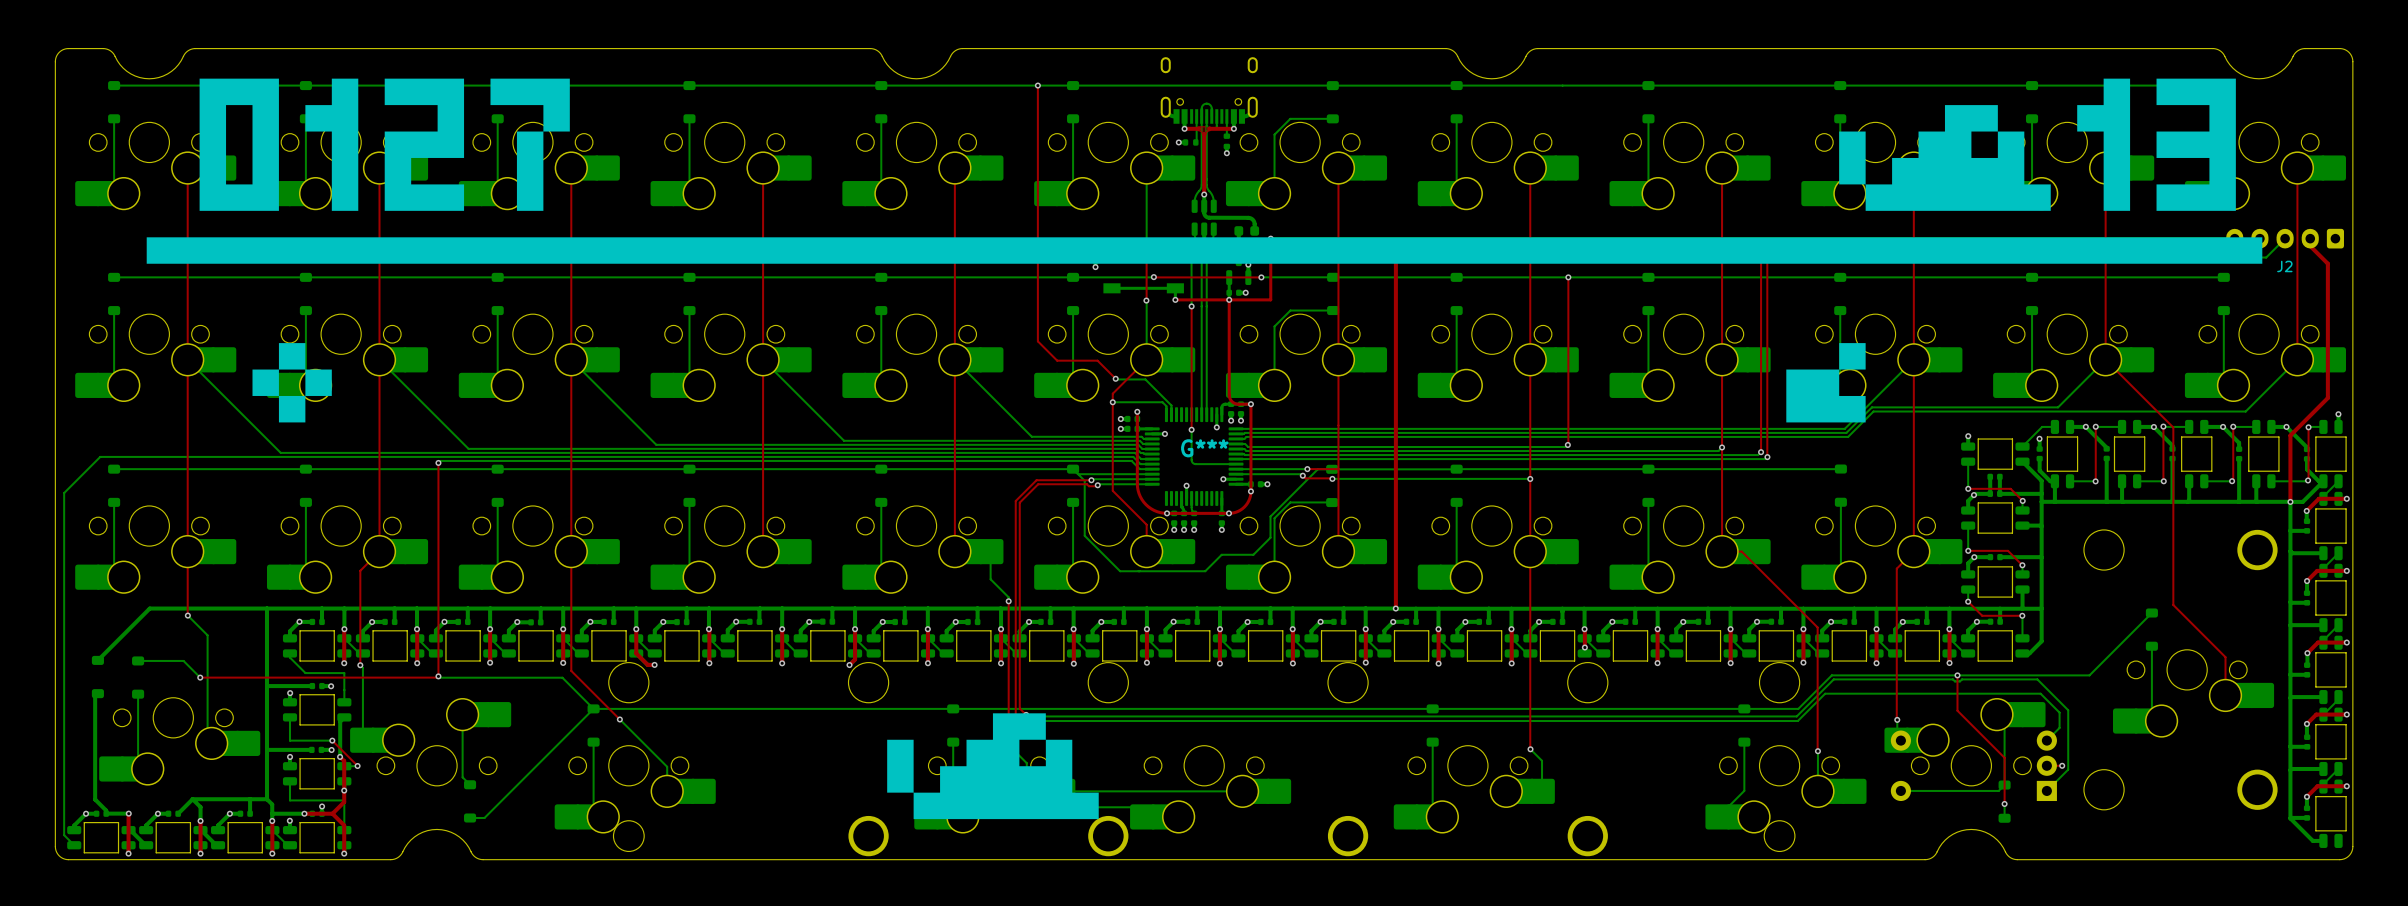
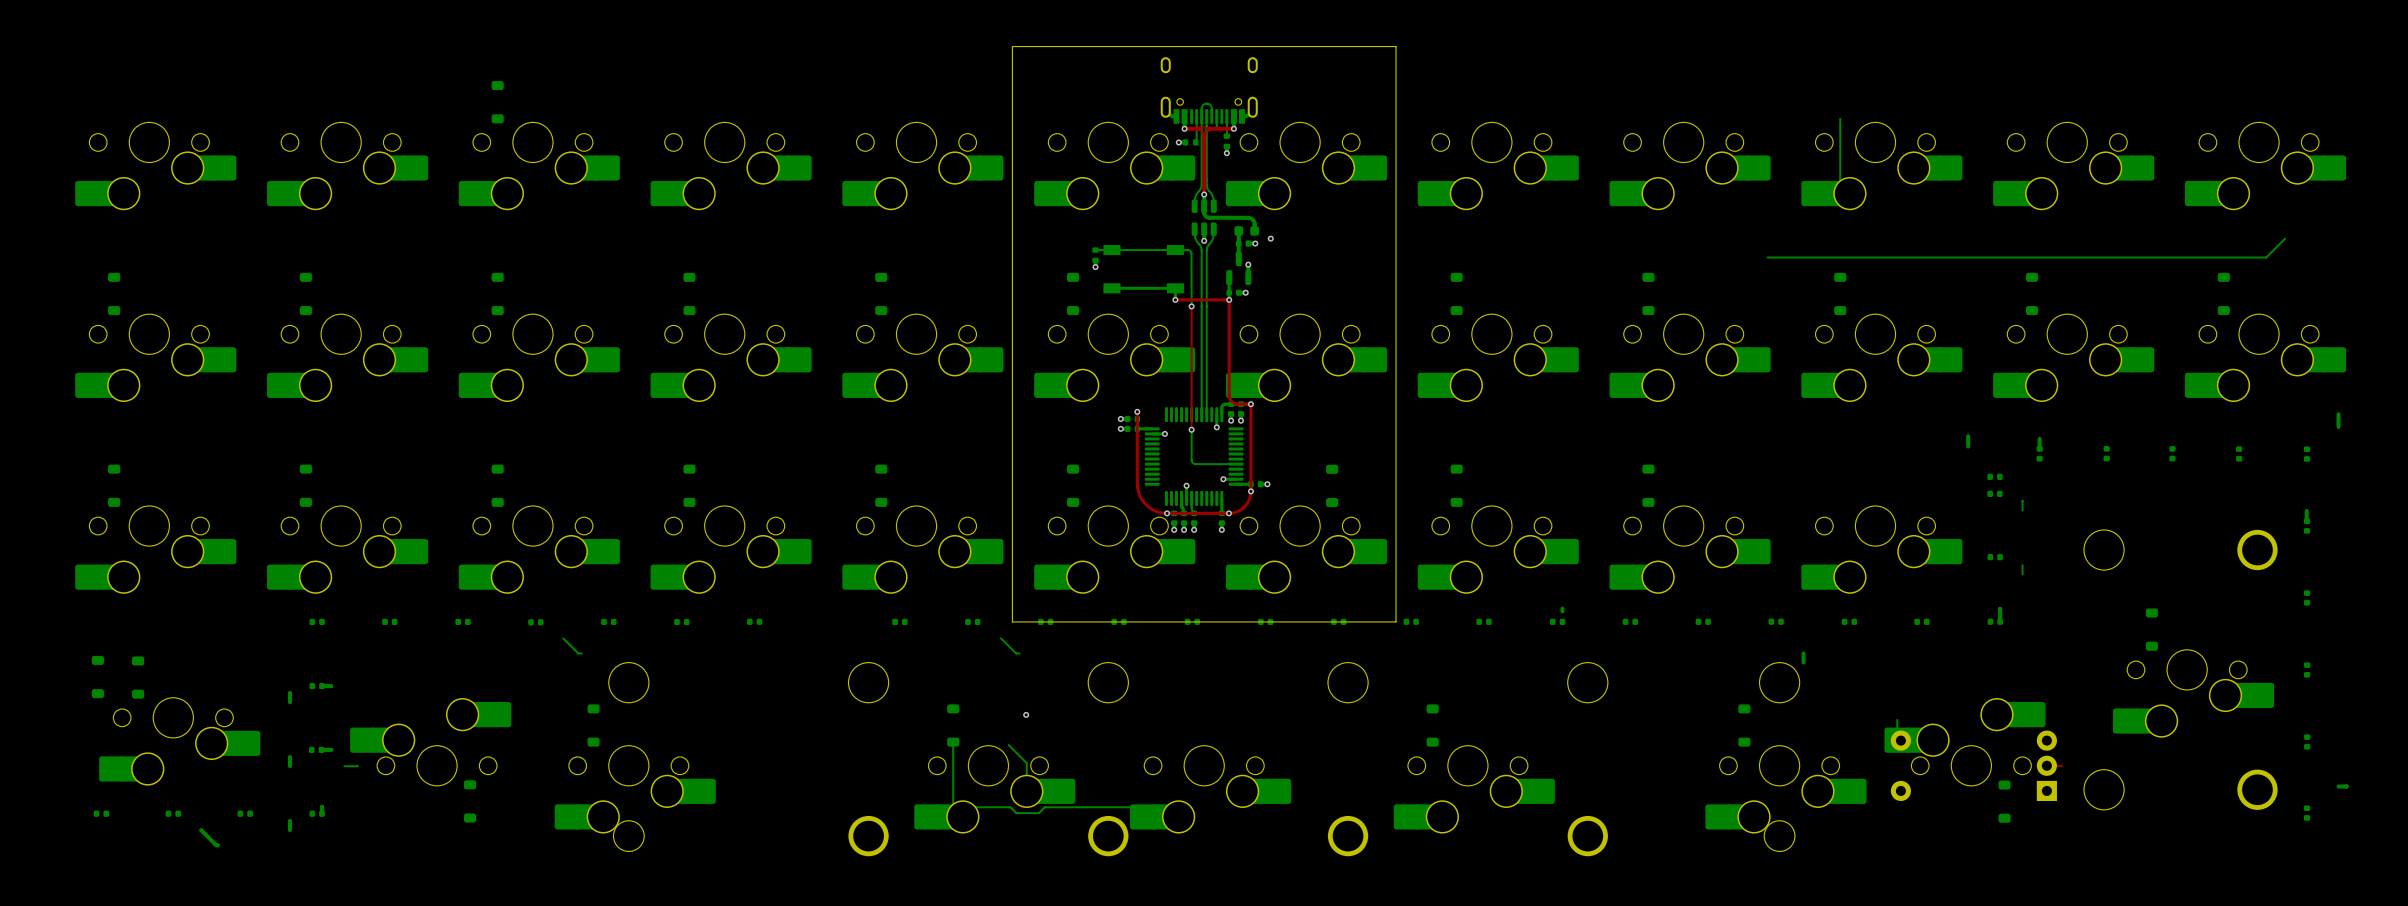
board edge: none -> (1012, 46) (1396, 46) (1396, 621) (1012, 621) (1012, 46)
board edge: (68, 48) (107, 49) (112, 52) (126, 71) (139, 77) (149, 78) (167, 73) (178, 64) (187, 51) (195, 48) (870, 48) (878, 51) (887, 64) (898, 73) (916, 78) (934, 73) (945, 64) (954, 51) (962, 48) (1445, 48) (1454, 51) (1462, 64) (1473, 73) (1491, 78) (1510, 73) (1521, 64) (1529, 51) (1537, 48) (2212, 48) (2221, 51) (2229, 64) (2240, 73) (2258, 78) (2268, 77) (2281, 71) (2295, 52) (2300, 49) (2344, 49) (2350, 54) (2352, 61) (2352, 850) (2346, 857) (2339, 859) (2017, 859) (2009, 856) (2000, 843) (1989, 834) (1971, 829) (1952, 834) (1942, 843) (1933, 856) (1925, 859) (483, 859) (474, 856) (466, 843) (455, 834) (436, 829) (427, 830) (414, 836) (400, 855) (392, 859) (64, 858) (57, 853) (55, 846) (55, 61) (59, 52) (68, 48) -> none
bottom track: (114, 85) (1332, 85) -> none
top track: (1037, 85) (1037, 341) (1057, 360) (1097, 360) (1115, 378) -> none
via: (1037, 85) -> none
bottom track: (1332, 85) (1456, 85) -> none
bottom track: (1456, 85) (2223, 85) -> none
part: (114, 102) -> none
part: (305, 102) -> none
part: (689, 102) -> none
part: (881, 102) -> none
part: (1073, 102) -> none
part: (1332, 102) -> none
part: (1456, 102) -> none
part: (1648, 102) -> none
part: (1840, 102) -> none
part: (2032, 102) -> none
bottom track: (114, 118) (114, 183) (123, 193) -> none
bottom track: (305, 118) (305, 183) (315, 193) -> none
bottom track: (497, 118) (497, 183) (507, 193) -> none
bottom track: (689, 118) (689, 183) (699, 193) -> none
bottom track: (881, 118) (881, 183) (890, 193) -> none
bottom track: (1073, 118) (1073, 183) (1082, 193) -> none
bottom track: (1332, 118) (1290, 118) (1274, 134) (1274, 193) -> none
bottom track: (1456, 118) (1456, 183) (1466, 193) -> none
bottom track: (1648, 118) (1648, 183) (1658, 193) -> none
bottom track: (2032, 118) (2032, 183) (2041, 193) -> none
top track: (187, 168) (187, 615) -> none
top track: (379, 168) (379, 551) (360, 570) (360, 665) -> none
top track: (571, 168) (571, 670) (619, 719) -> none
top track: (763, 168) (763, 551) -> none
top track: (954, 168) (954, 551) -> none
bottom track: (1146, 168) (1146, 243) -> none
top track: (1338, 168) (1338, 551) -> none
top track: (1530, 168) (1530, 749) -> none
top track: (1722, 168) (1722, 551) (1741, 551) (1817, 627) (1817, 751) -> none
top track: (1913, 168) (1913, 551) (1896, 568) (1897, 719) -> none
top track: (2105, 168) (2105, 359) (2173, 427) (2173, 605) (2225, 657) (2225, 695) -> none
top track: (2297, 168) (2297, 359) -> none
top track: (1270, 238) (1270, 299) (1229, 299) -> none
J2: (2285, 238) -> none
top track: (2310, 238) (2310, 246) (2327, 263) (2327, 398) (2290, 435) (2290, 501) -> none
top track: (1146, 243) (1146, 300) -> none
top track: (1761, 251) (1761, 452) -> none
top track: (1395, 256) (1395, 608) -> none
top track: (1767, 257) (1767, 456) -> none
top track: (1153, 277) (1261, 277) -> none
bottom track: (1153, 277) (114, 277) -> none
via: (1153, 277) -> none
via: (1261, 277) -> none
top track: (1568, 277) (1567, 444) -> none
via: (1568, 277) -> none
part: (1333, 293) -> none
bottom track: (1146, 300) (1146, 359) -> none
via: (1146, 300) -> none
bottom track: (114, 310) (114, 375) (123, 385) -> none
bottom track: (305, 310) (305, 375) (315, 385) -> none
bottom track: (497, 310) (497, 375) (507, 385) -> none
bottom track: (689, 310) (689, 375) (699, 385) -> none
bottom track: (881, 310) (881, 375) (890, 385) -> none
bottom track: (1073, 310) (1073, 375) (1082, 385) -> none
bottom track: (1333, 310) (1290, 310) (1274, 326) (1274, 385) -> none
bottom track: (1456, 310) (1456, 375) (1466, 385) -> none
bottom track: (1648, 310) (1648, 375) (1658, 385) -> none
bottom track: (1840, 310) (1840, 375) (1849, 385) -> none
bottom track: (2032, 310) (2032, 375) (2041, 385) -> none
bottom track: (2223, 310) (2223, 375) (2233, 385) -> none
bottom track: (187, 359) (280, 452) (1134, 452) (1141, 459) (1152, 459) -> none
bottom track: (379, 359) (468, 448) (1136, 448) (1140, 453) (1152, 454) -> none
bottom track: (571, 359) (656, 444) (1138, 444) (1142, 449) (1152, 449) -> none
bottom track: (763, 359) (844, 440) (1139, 440) (1143, 443) (1152, 443) -> none
bottom track: (954, 359) (1031, 436) (1141, 436) (1143, 438) (1152, 438) -> none
top track: (1146, 359) (1112, 393) (1112, 490) (1146, 524) (1146, 551) -> none
bottom track: (1913, 359) (1844, 428) (1236, 428) -> none
bottom track: (2105, 359) (2058, 407) (1871, 407) (1846, 432) (1236, 433) -> none
bottom track: (2297, 359) (2245, 411) (1873, 411) (1848, 436) (1246, 436) (1244, 438) (1236, 438) -> none
bottom track: (1115, 378) (1145, 379) (1171, 405) (1171, 414) -> none
via: (1115, 378) -> none
bottom track: (1112, 402) (1162, 402) (1166, 406) (1166, 414) -> none
via: (1112, 402) -> none
via: (2338, 414) -> none
bottom track: (2054, 426) (2042, 426) (2022, 446) -> none
bottom track: (2070, 426) (2085, 426) -> none
bottom track: (2085, 426) (2106, 448) -> none
via: (2085, 426) -> none
top track: (2095, 426) (2095, 481) -> none
bottom track: (2095, 426) (2122, 426) -> none
via: (2095, 426) -> none
bottom track: (2137, 426) (2153, 426) (2172, 445) (2172, 448) -> none
top track: (2163, 426) (2163, 481) -> none
bottom track: (2163, 426) (2189, 426) -> none
via: (2163, 426) -> none
bottom track: (2204, 426) (2223, 426) (2239, 442) (2239, 449) -> none
via: (2223, 426) -> none
top track: (2233, 426) (2232, 481) -> none
bottom track: (2233, 426) (2256, 426) -> none
via: (2233, 426) -> none
bottom track: (2271, 426) (2286, 426) (2307, 449) -> none
via: (2286, 426) -> none
bottom track: (2323, 426) (2308, 427) -> none
via: (2153, 427) -> none
top track: (2308, 427) (2308, 480) -> none
via: (2308, 427) -> none
via: (1968, 436) -> none
via: (2039, 438) -> none
bottom track: (1236, 443) (1245, 443) (1248, 447) (1565, 447) (1567, 444) -> none
via: (1567, 444) -> none
bottom track: (1722, 447) (1718, 451) (1246, 451) (1244, 449) (1236, 449) -> none
via: (1722, 447) -> none
G***: (1204, 448) -> none
bottom track: (1761, 452) (1758, 455) (1236, 454) -> none
via: (1761, 452) -> none
part: (1995, 454) -> none
part: (2062, 454) -> none
part: (2129, 454) -> none
part: (2196, 454) -> none
part: (2263, 454) -> none
part: (2330, 454) -> none
bottom track: (1767, 457) (1765, 459) (1236, 459) -> none
via: (1767, 457) -> none
bottom track: (2039, 458) (2039, 470) (2050, 481) (2054, 481) (2054, 501) -> none
bottom track: (2106, 458) (2107, 501) -> none
bottom track: (2172, 458) (2172, 501) -> none
bottom track: (2239, 458) (2239, 501) -> none
bottom track: (2307, 458) (2307, 469) (2318, 481) (2323, 481) (2302, 501) (2290, 501) (2290, 818) -> none
bottom track: (1968, 461) (1968, 488) -> none
bottom track: (2022, 461) (2041, 480) (2041, 641) (2029, 653) (2022, 653) -> none
top track: (438, 462) (437, 677) (200, 677) -> none
bottom track: (438, 462) (440, 460) (1131, 460) (1139, 469) (1152, 469) -> none
via: (438, 462) -> none
bottom track: (1152, 464) (1140, 464) (1133, 456) (100, 456) (64, 493) (64, 835) (74, 845) -> none
top track: (1338, 468) (1307, 469) -> none
bottom track: (114, 469) (1073, 469) (1084, 480) (1084, 535) (1120, 571) (1205, 571) (1221, 554) (1253, 554) (1270, 537) (1270, 516) (1317, 469) (1840, 469) -> none
bottom track: (1236, 469) (1307, 469) -> none
via: (1307, 469) -> none
bottom track: (1078, 474) (1152, 474) -> none
bottom track: (1236, 474) (1302, 475) -> none
top track: (1302, 475) (1305, 478) (1332, 478) -> none
via: (1302, 475) -> none
bottom track: (1990, 476) (1990, 493) -> none
bottom track: (1999, 476) (1999, 493) -> none
bottom track: (1332, 478) (1530, 478) -> none
via: (1332, 478) -> none
via: (1530, 478) -> none
bottom track: (1152, 479) (1091, 480) -> none
top track: (1091, 480) (1036, 480) (1015, 501) (1015, 715) (1018, 717) -> none
via: (1091, 480) -> none
bottom track: (2308, 480) (2271, 481) -> none
via: (2308, 480) -> none
bottom track: (2070, 481) (2095, 481) -> none
via: (2095, 481) -> none
bottom track: (2122, 481) (2122, 501) -> none
bottom track: (2137, 481) (2163, 481) -> none
via: (2163, 481) -> none
bottom track: (2189, 481) (2187, 501) -> none
bottom track: (2204, 481) (2231, 481) -> none
via: (2232, 481) -> none
bottom track: (2256, 481) (2256, 501) -> none
bottom track: (2338, 481) (2323, 496) (2323, 498) -> none
bottom track: (1152, 484) (1097, 485) -> none
top track: (1097, 485) (1038, 484) (1019, 502) (1019, 708) (1026, 714) -> none
via: (1097, 485) -> none
part: (1840, 485) -> none
top track: (1968, 488) (2010, 488) (2022, 500) -> none
via: (1968, 488) -> none
bottom track: (1990, 493) (1975, 493) (1968, 500) (1968, 510) -> none
bottom track: (1999, 493) (2041, 493) -> none
via: (1973, 495) -> none
top track: (2346, 498) (2318, 498) (2306, 510) -> none
via: (2346, 498) -> none
via: (2022, 500) -> none
bottom track: (2041, 501) (2290, 501) -> none
via: (2290, 501) -> none
bottom track: (114, 502) (114, 567) (123, 577) -> none
bottom track: (305, 502) (305, 567) (315, 577) -> none
bottom track: (497, 502) (497, 567) (507, 577) -> none
bottom track: (689, 502) (689, 567) (699, 577) -> none
bottom track: (881, 502) (881, 567) (890, 577) -> none
bottom track: (1073, 502) (1073, 567) (1082, 577) -> none
bottom track: (1332, 502) (1290, 502) (1274, 518) (1274, 577) -> none
bottom track: (1456, 502) (1456, 567) (1466, 577) -> none
bottom track: (1648, 502) (1648, 567) (1658, 577) -> none
bottom track: (1840, 502) (1840, 568) (1849, 577) -> none
via: (2306, 510) -> none
part: (1995, 518) -> none
bottom track: (1968, 525) (1968, 548) -> none
bottom track: (2022, 525) (2041, 526) -> none
part: (2330, 526) -> none
bottom track: (2290, 530) (2307, 530) -> none
top track: (1968, 550) (2008, 550) (2022, 565) -> none
via: (1968, 550) -> none
bottom track: (990, 551) (990, 579) (1008, 597) (1008, 601) -> none
bottom track: (2290, 551) (2292, 553) (2323, 553) -> none
bottom track: (2338, 553) (2323, 568) (2323, 570) -> none
via: (1974, 557) -> none
bottom track: (1990, 557) (1974, 557) (1968, 563) (1968, 574) -> none
bottom track: (2000, 557) (2041, 557) -> none
via: (2022, 565) -> none
top track: (2346, 570) (2317, 570) (2307, 581) -> none
via: (2346, 570) -> none
part: (1995, 581) -> none
bottom track: (2307, 581) (2307, 593) -> none
via: (2307, 581) -> none
bottom track: (1968, 589) (1968, 601) -> none
bottom track: (2022, 589) (2022, 608) -> none
part: (2330, 597) -> none
top track: (1008, 601) (1008, 745) -> none
via: (1008, 601) -> none
top track: (1968, 601) (1982, 615) (2022, 615) -> none
via: (1968, 601) -> none
bottom track: (2290, 602) (2307, 602) -> none
bottom track: (266, 608) (149, 608) (97, 660) -> none
bottom track: (266, 608) (266, 799) -> none
bottom track: (267, 608) (2041, 608) -> none
bottom track: (321, 608) (322, 621) -> none
bottom track: (344, 608) (344, 629) -> none
bottom track: (394, 608) (394, 621) -> none
bottom track: (416, 608) (417, 629) -> none
bottom track: (467, 608) (467, 621) -> none
bottom track: (490, 608) (490, 629) -> none
bottom track: (541, 608) (540, 622) -> none
bottom track: (562, 608) (563, 629) -> none
bottom track: (613, 608) (613, 621) -> none
bottom track: (636, 608) (636, 629) -> none
bottom track: (686, 608) (686, 622) -> none
bottom track: (708, 608) (708, 629) -> none
bottom track: (760, 608) (759, 621) -> none
bottom track: (782, 608) (782, 629) -> none
bottom track: (832, 608) (832, 621) -> none
bottom track: (855, 608) (855, 629) -> none
bottom track: (904, 608) (904, 622) -> none
bottom track: (928, 608) (927, 629) -> none
bottom track: (977, 608) (977, 622) -> none
bottom track: (1000, 608) (1001, 629) -> none
bottom track: (1050, 608) (1050, 621) -> none
bottom track: (1073, 608) (1073, 629) -> none
bottom track: (1123, 608) (1123, 621) -> none
bottom track: (1146, 608) (1146, 629) -> none
bottom track: (1197, 608) (1197, 621) -> none
bottom track: (1220, 608) (1220, 629) -> none
bottom track: (1270, 608) (1270, 621) -> none
bottom track: (1292, 608) (1292, 629) -> none
bottom track: (1343, 608) (1343, 621) -> none
bottom track: (1365, 608) (1365, 629) -> none
via: (1395, 608) -> none
bottom track: (1415, 608) (1416, 621) -> none
bottom track: (1438, 608) (1438, 629) -> none
bottom track: (1488, 608) (1488, 621) -> none
bottom track: (1511, 608) (1511, 629) -> none
bottom track: (1584, 608) (1584, 629) -> none
bottom track: (1635, 608) (1635, 621) -> none
bottom track: (1657, 608) (1657, 629) -> none
bottom track: (1708, 608) (1708, 621) -> none
bottom track: (1730, 608) (1730, 629) -> none
bottom track: (1780, 608) (1780, 621) -> none
bottom track: (1803, 608) (1803, 629) -> none
bottom track: (1854, 608) (1854, 621) -> none
bottom track: (1876, 608) (1876, 629) -> none
bottom track: (1926, 608) (1926, 621) -> none
bottom track: (1949, 608) (1949, 629) -> none
bottom track: (1562, 611) (1562, 621) -> none
bottom track: (2151, 613) (2089, 675) (1831, 675) (1798, 708) (593, 708) -> none
bottom track: (187, 615) (207, 635) (207, 739) (211, 743) -> none
via: (187, 615) -> none
bottom track: (2022, 615) (2022, 638) -> none
via: (2022, 615) -> none
via: (299, 621) -> none
bottom track: (312, 621) (299, 621) (289, 631) (289, 638) -> none
bottom track: (385, 621) (372, 621) (362, 631) (362, 638) -> none
bottom track: (444, 621) (435, 630) (435, 638) -> none
bottom track: (444, 621) (458, 621) -> none
via: (444, 621) -> none
bottom track: (590, 621) (581, 630) (581, 638) -> none
bottom track: (590, 621) (604, 621) -> none
via: (590, 621) -> none
via: (663, 621) -> none
bottom track: (736, 621) (727, 630) (727, 638) -> none
bottom track: (736, 621) (749, 621) -> none
via: (736, 621) -> none
via: (809, 621) -> none
bottom track: (822, 621) (809, 621) (800, 630) (800, 638) -> none
part: (827, 621) -> none
bottom track: (882, 621) (873, 630) (873, 638) -> none
via: (882, 621) -> none
bottom track: (955, 621) (946, 631) (946, 638) -> none
via: (955, 621) -> none
via: (1029, 621) -> none
bottom track: (1040, 621) (1029, 621) (1019, 631) (1019, 638) -> none
via: (1101, 621) -> none
bottom track: (1114, 621) (1101, 621) (1092, 630) (1092, 638) -> none
bottom track: (1173, 621) (1165, 629) (1165, 638) -> none
bottom track: (1173, 621) (1187, 621) -> none
via: (1173, 621) -> none
bottom track: (1260, 621) (1247, 621) (1238, 631) (1238, 638) -> none
bottom track: (1320, 621) (1311, 630) (1311, 638) -> none
bottom track: (1320, 621) (1333, 621) -> none
via: (1320, 621) -> none
via: (1393, 621) -> none
bottom track: (1406, 621) (1393, 621) (1384, 630) (1384, 638) -> none
via: (1465, 621) -> none
bottom track: (1479, 621) (1465, 621) (1457, 629) (1457, 638) -> none
via: (1539, 621) -> none
bottom track: (1552, 621) (1539, 621) (1530, 630) (1530, 638) -> none
via: (1612, 621) -> none
bottom track: (1625, 621) (1612, 621) (1603, 630) (1603, 638) -> none
via: (1683, 621) -> none
bottom track: (1698, 621) (1683, 621) (1676, 628) (1676, 638) -> none
via: (1757, 621) -> none
bottom track: (1771, 621) (1757, 621) (1749, 629) (1749, 638) -> none
via: (1831, 621) -> none
bottom track: (1844, 621) (1831, 621) (1822, 630) (1822, 638) -> none
via: (1902, 621) -> none
bottom track: (1917, 621) (1902, 621) (1895, 629) (1895, 638) -> none
via: (1976, 621) -> none
bottom track: (1990, 621) (1977, 621) (1968, 630) (1968, 638) -> none
via: (372, 622) -> none
via: (517, 622) -> none
bottom track: (531, 622) (517, 622) (508, 630) (508, 638) -> none
bottom track: (677, 622) (663, 621) (654, 630) (654, 638) -> none
bottom track: (882, 622) (895, 622) -> none
bottom track: (955, 622) (967, 622) -> none
via: (1247, 622) -> none
bottom track: (2290, 625) (2323, 625) -> none
bottom track: (2338, 625) (2323, 640) (2323, 642) -> none
top track: (344, 629) (344, 663) -> none
via: (344, 629) -> none
top track: (417, 629) (417, 663) -> none
via: (417, 629) -> none
top track: (490, 629) (490, 662) -> none
via: (490, 629) -> none
top track: (563, 629) (563, 662) -> none
via: (563, 629) -> none
top track: (636, 629) (636, 653) (647, 664) (654, 664) -> none
via: (636, 629) -> none
top track: (708, 629) (709, 663) -> none
via: (708, 629) -> none
top track: (782, 629) (782, 663) -> none
via: (782, 629) -> none
top track: (855, 629) (855, 659) (849, 665) -> none
via: (855, 629) -> none
top track: (927, 629) (927, 663) -> none
via: (927, 629) -> none
top track: (1001, 629) (1001, 663) -> none
via: (1001, 629) -> none
top track: (1073, 629) (1073, 663) -> none
via: (1073, 629) -> none
top track: (1146, 629) (1146, 662) -> none
via: (1146, 629) -> none
top track: (1219, 629) (1219, 663) -> none
via: (1220, 629) -> none
top track: (1292, 629) (1292, 663) -> none
via: (1292, 629) -> none
top track: (1365, 629) (1365, 662) -> none
via: (1365, 629) -> none
top track: (1438, 629) (1438, 663) -> none
via: (1438, 629) -> none
top track: (1511, 629) (1511, 663) -> none
via: (1511, 629) -> none
top track: (1584, 629) (1584, 647) -> none
via: (1584, 629) -> none
top track: (1657, 629) (1657, 663) -> none
via: (1657, 629) -> none
top track: (1730, 629) (1730, 663) -> none
via: (1730, 629) -> none
top track: (1803, 629) (1803, 662) -> none
via: (1803, 629) -> none
top track: (1876, 629) (1876, 663) -> none
via: (1876, 629) -> none
top track: (1949, 629) (1949, 663) -> none
via: (1949, 629) -> none
bottom track: (344, 638) (359, 653) (362, 653) -> none
bottom track: (417, 638) (432, 653) (435, 653) -> none
bottom track: (490, 638) (505, 653) (508, 653) -> none
bottom track: (636, 638) (651, 653) (654, 653) -> none
bottom track: (709, 638) (724, 653) (727, 653) -> none
bottom track: (782, 638) (797, 653) (800, 653) -> none
bottom track: (855, 638) (870, 653) (873, 653) -> none
bottom track: (928, 638) (943, 653) (946, 653) -> none
bottom track: (1073, 638) (1089, 653) (1092, 653) -> none
bottom track: (1146, 638) (1162, 653) (1165, 653) -> none
bottom track: (1219, 638) (1234, 653) (1238, 653) -> none
bottom track: (1292, 638) (1307, 653) (1311, 653) -> none
bottom track: (1365, 638) (1380, 653) (1384, 653) -> none
bottom track: (1438, 638) (1453, 653) (1457, 653) -> none
bottom track: (1511, 638) (1526, 653) (1530, 653) -> none
bottom track: (1584, 638) (1599, 653) (1603, 653) -> none
bottom track: (1657, 638) (1672, 653) (1676, 653) -> none
bottom track: (1730, 638) (1745, 653) (1749, 653) -> none
bottom track: (1803, 638) (1818, 653) (1822, 653) -> none
bottom track: (1876, 638) (1891, 653) (1895, 653) -> none
bottom track: (1949, 638) (1964, 653) (1968, 653) -> none
top track: (2346, 642) (2318, 642) (2307, 653) -> none
via: (2346, 642) -> none
part: (317, 645) -> none
part: (390, 645) -> none
part: (463, 645) -> none
part: (536, 645) -> none
part: (609, 645) -> none
part: (681, 645) -> none
part: (754, 645) -> none
part: (827, 645) -> none
part: (900, 645) -> none
part: (973, 645) -> none
part: (1046, 645) -> none
part: (1119, 645) -> none
part: (1192, 645) -> none
part: (1265, 645) -> none
part: (1338, 645) -> none
part: (1411, 645) -> none
part: (1484, 645) -> none
part: (1557, 645) -> none
part: (1630, 645) -> none
part: (1703, 645) -> none
part: (1776, 645) -> none
part: (1849, 645) -> none
part: (1922, 645) -> none
part: (1995, 645) -> none
bottom track: (2151, 646) (2151, 711) (2161, 721) -> none
via: (1584, 647) -> none
bottom track: (289, 653) (289, 657) (305, 673) (344, 673) (344, 689) -> none
bottom track: (2307, 653) (2307, 665) -> none
via: (2307, 653) -> none
bottom track: (138, 660) (183, 660) (200, 677) -> none
via: (490, 662) -> none
via: (563, 662) -> none
via: (1146, 662) -> none
via: (1365, 662) -> none
via: (1803, 662) -> none
via: (344, 663) -> none
via: (417, 663) -> none
via: (709, 663) -> none
via: (782, 663) -> none
via: (927, 663) -> none
via: (1001, 663) -> none
via: (1073, 663) -> none
via: (1219, 663) -> none
via: (1292, 663) -> none
via: (1438, 663) -> none
via: (1511, 663) -> none
via: (1657, 663) -> none
via: (1730, 663) -> none
via: (1876, 663) -> none
via: (1949, 663) -> none
via: (654, 664) -> none
bottom track: (360, 665) (362, 667) (362, 740) -> none
via: (360, 665) -> none
via: (849, 665) -> none
part: (2330, 669) -> none
bottom track: (2290, 674) (2307, 674) -> none
top track: (1957, 675) (1957, 710) (2004, 757) (2004, 803) -> none
via: (1957, 675) -> none
bottom track: (438, 676) (562, 677) (593, 708) -> none
via: (438, 676) -> none
via: (200, 677) -> none
bottom track: (266, 685) (312, 686) -> none
via: (331, 686) -> none
bottom track: (344, 690) (344, 702) -> none
bottom track: (97, 693) (95, 696) (95, 799) (106, 810) (106, 813) -> none
via: (290, 693) -> none
bottom track: (138, 694) (138, 759) (147, 768) -> none
bottom track: (2323, 697) (2290, 697) -> none
bottom track: (2338, 697) (2338, 699) (2323, 714) -> none
bottom track: (593, 708) (484, 817) (470, 817) -> none
part: (317, 709) -> none
bottom track: (462, 714) (462, 777) (470, 784) -> none
bottom track: (1026, 714) (1027, 716) (1796, 716) (1833, 679) (1952, 679) (1954, 681) (1962, 679) (2037, 679) (2068, 710) (2068, 769) (2046, 790) -> none
bottom track: (1996, 714) (2004, 722) (2004, 785) (1998, 790) (1900, 790) -> none
top track: (2346, 714) (2316, 714) (2306, 723) -> none
via: (2346, 714) -> none
bottom track: (289, 717) (289, 740) (332, 740) -> none
bottom track: (344, 717) (340, 721) (340, 756) -> none
bottom track: (1018, 717) (1021, 721) (1797, 721) (1825, 693) (2040, 693) (2059, 712) (2059, 727) (2046, 740) -> none
bottom track: (619, 719) (667, 766) (667, 791) -> none
via: (619, 719) -> none
via: (1897, 719) -> none
bottom track: (2306, 723) (2307, 737) -> none
via: (2306, 723) -> none
top track: (332, 740) (357, 765) -> none
via: (332, 740) -> none
part: (2330, 741) -> none
bottom track: (593, 742) (593, 807) (603, 816) -> none
bottom track: (1432, 742) (1432, 807) (1442, 816) -> none
bottom track: (1744, 742) (1744, 790) (1718, 816) -> none
bottom track: (2290, 746) (2307, 746) -> none
bottom track: (267, 749) (311, 749) -> none
via: (331, 749) -> none
bottom track: (1530, 749) (1542, 760) (1542, 791) -> none
via: (1530, 749) -> none
bottom track: (1817, 751) (1817, 791) -> none
via: (1817, 751) -> none
via: (290, 756) -> none
top track: (340, 756) (344, 761) (344, 802) (332, 813) -> none
via: (340, 756) -> none
via: (2062, 765) -> none
via: (357, 766) -> none
bottom track: (2323, 768) (2290, 770) -> none
bottom track: (2338, 768) (2323, 784) (2323, 786) -> none
part: (317, 773) -> none
bottom track: (289, 781) (289, 800) (344, 800) (344, 825) -> none
top track: (2346, 786) (2317, 786) (2306, 796) -> none
via: (2346, 786) -> none
via: (344, 790) -> none
bottom track: (1062, 791) (1242, 791) -> none
bottom track: (2306, 796) (2306, 808) -> none
via: (2306, 796) -> none
bottom track: (192, 799) (266, 799) -> none
bottom track: (192, 799) (200, 807) (200, 820) -> none
bottom track: (192, 799) (178, 813) -> none
bottom track: (250, 799) (250, 813) -> none
bottom track: (266, 799) (272, 804) (272, 820) -> none
bottom track: (2004, 803) (2004, 818) -> none
via: (2004, 803) -> none
via: (322, 806) -> none
via: (86, 813) -> none
bottom track: (96, 813) (86, 813) (74, 825) (74, 830) -> none
bottom track: (106, 813) (128, 813) -> none
top track: (128, 813) (128, 853) -> none
via: (128, 813) -> none
via: (157, 813) -> none
bottom track: (168, 813) (157, 813) (146, 825) (146, 830) -> none
via: (229, 813) -> none
bottom track: (240, 813) (229, 813) (218, 825) (218, 830) -> none
bottom track: (272, 813) (312, 813) -> none
top track: (304, 813) (332, 813) -> none
via: (304, 813) -> none
top track: (332, 813) (344, 825) (344, 853) -> none
part: (2330, 813) -> none
bottom track: (2307, 817) (2290, 818) -> none
bottom track: (2290, 818) (2312, 840) (2323, 840) -> none
top track: (200, 820) (200, 853) -> none
via: (200, 820) -> none
via: (272, 820) -> none
via: (289, 820) -> none
top track: (272, 821) (272, 853) -> none
bottom track: (128, 830) (146, 845) -> none
bottom track: (272, 830) (287, 845) (289, 845) -> none
part: (101, 837) -> none
part: (173, 837) -> none
part: (245, 837) -> none
part: (317, 837) -> none
via: (128, 853) -> none
via: (200, 853) -> none
via: (272, 853) -> none
via: (344, 853) -> none

